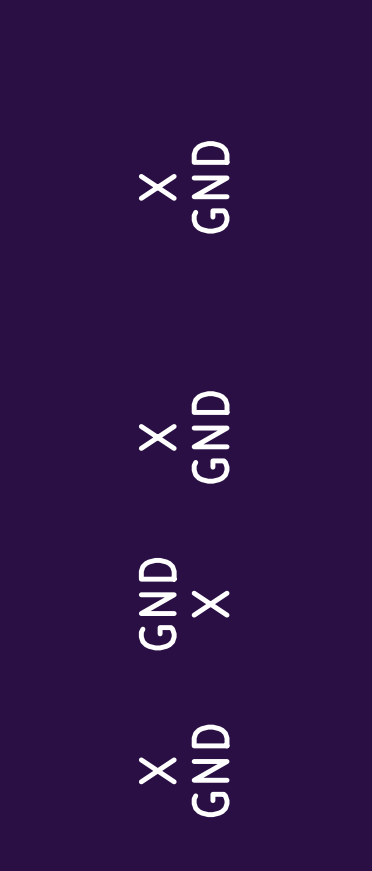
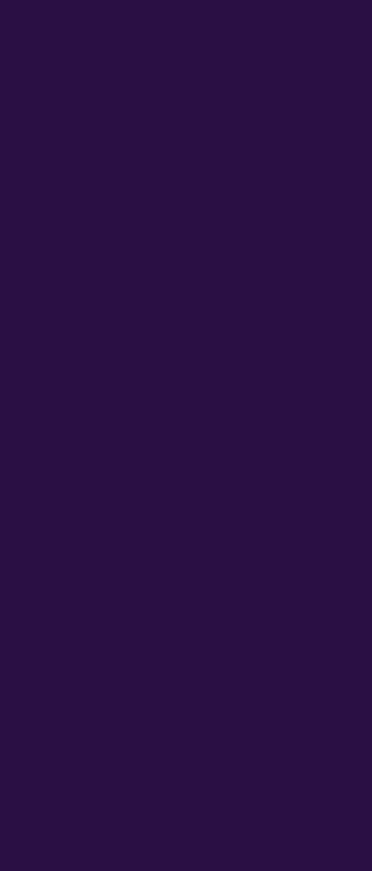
text: X (157, 187) -> none
text: GND (210, 187) -> none
text: X (157, 437) -> none
text: GND (210, 437) -> none
text: GND (157, 604) -> none
text: X (210, 604) -> none
text: X (157, 770) -> none
text: GND (210, 770) -> none

